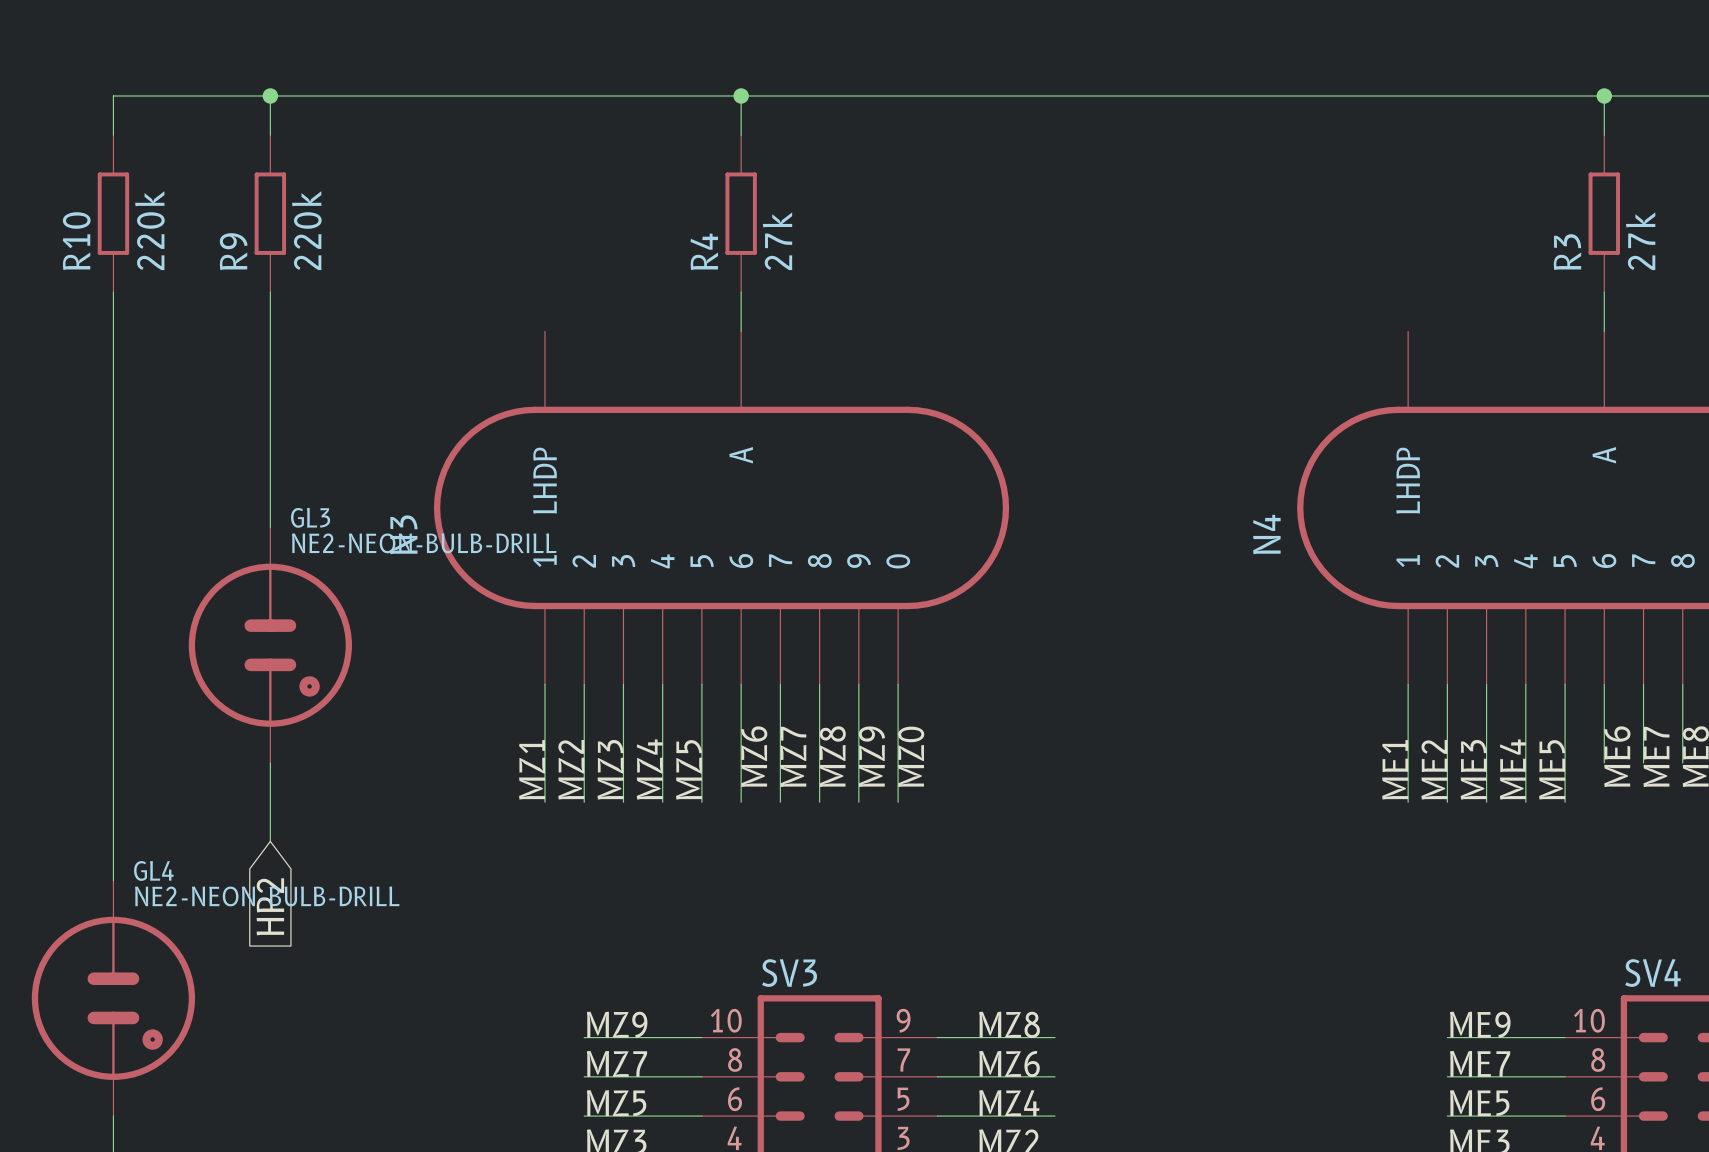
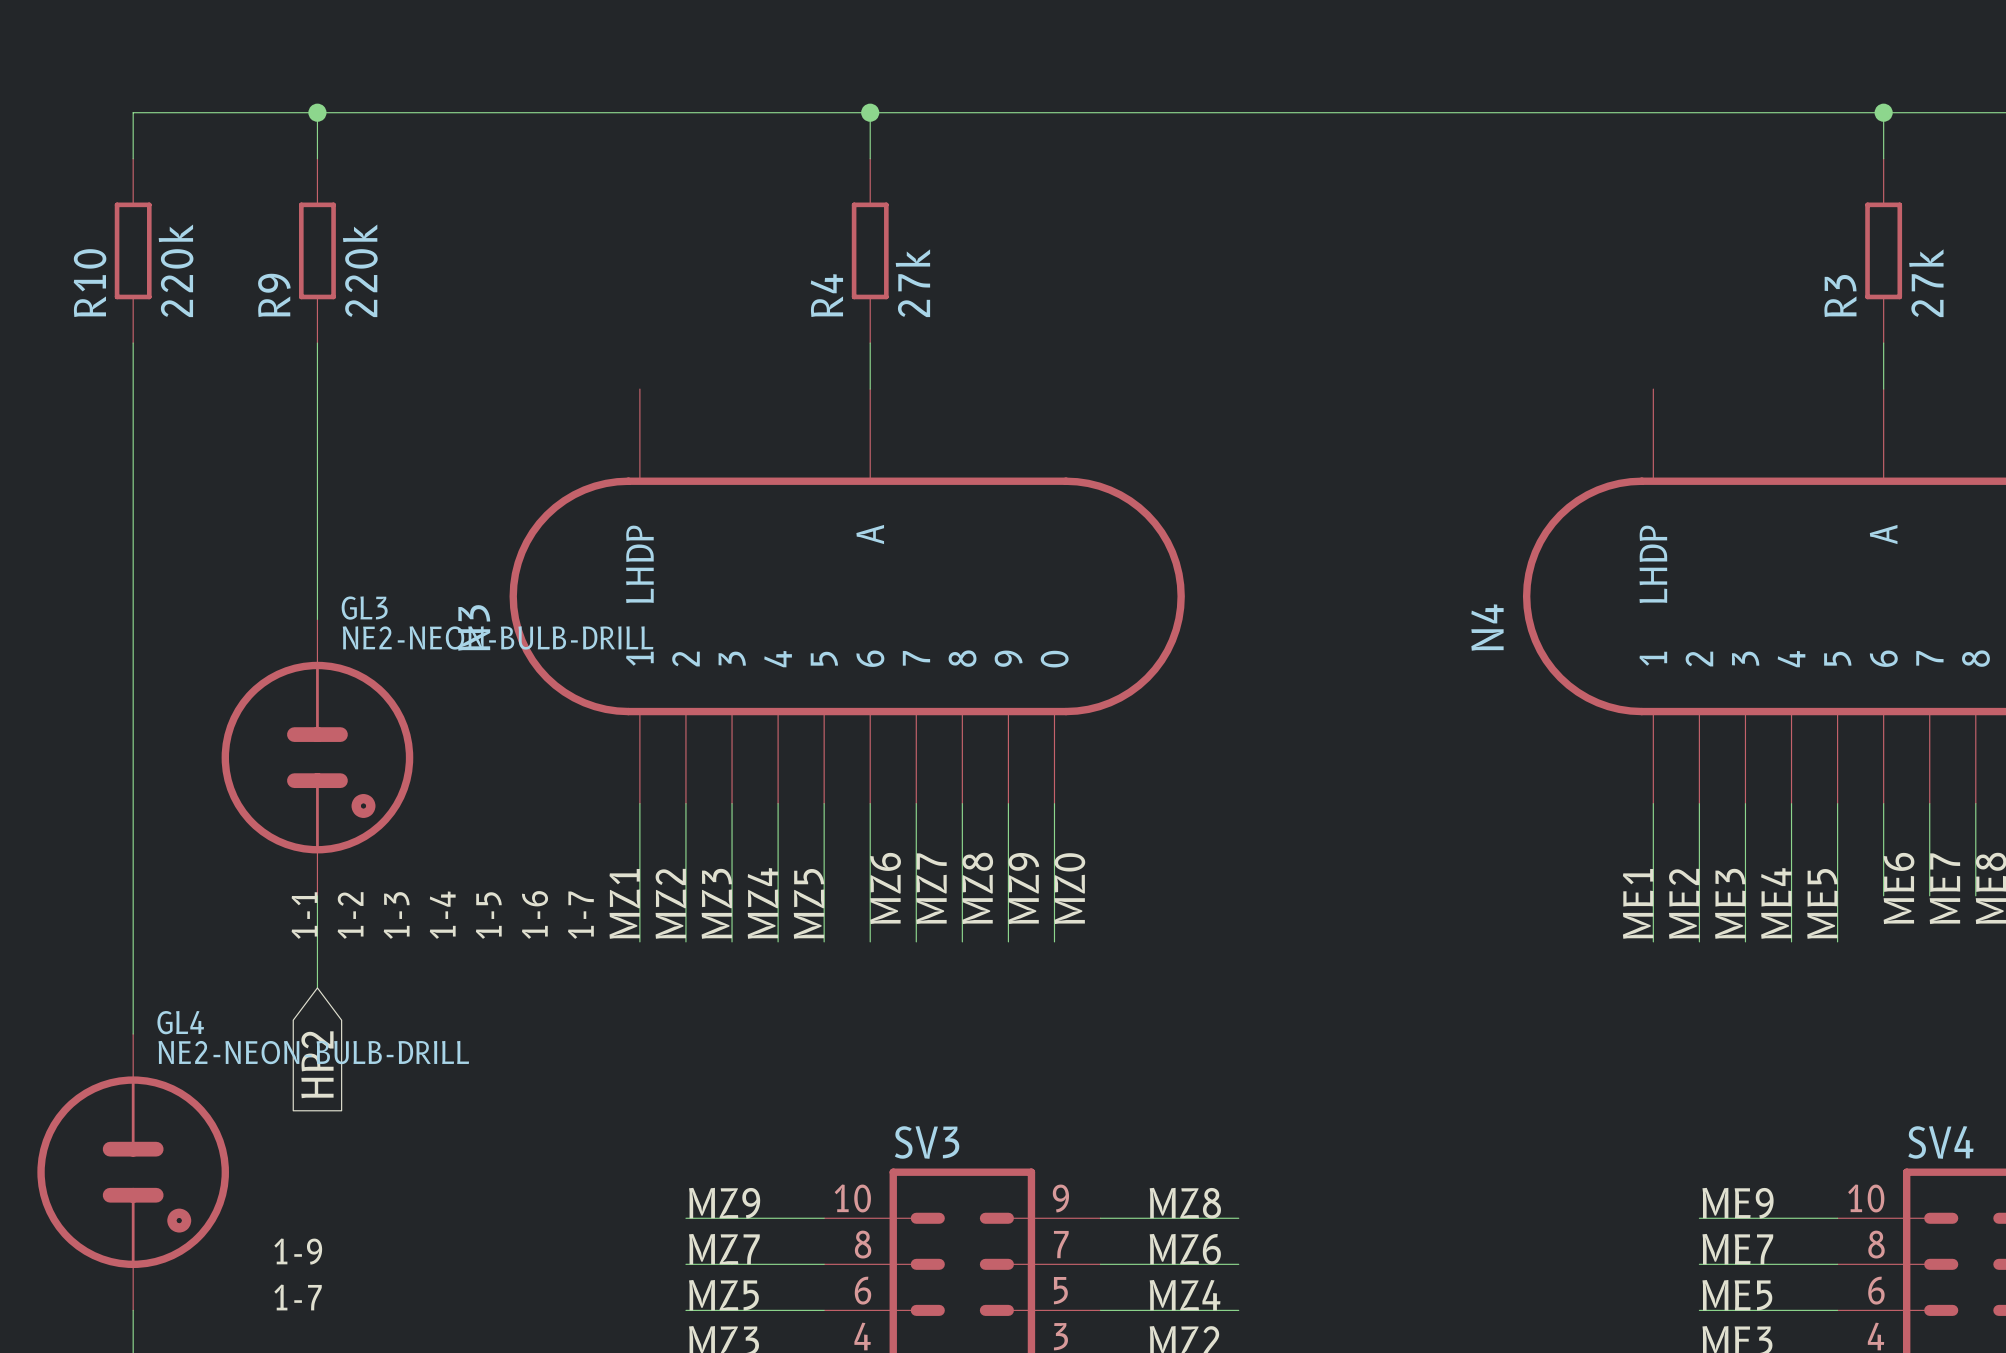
label: none -> 1-1 (304, 915)
label: none -> 1-2 (350, 915)
label: none -> 1-3 (396, 915)
label: none -> 1-4 (442, 915)
label: none -> 1-5 (488, 915)
label: none -> 1-6 (535, 914)
label: none -> 1-7 (580, 915)
label: none -> 1-9 (298, 1251)
label: none -> 1-7 (298, 1297)

